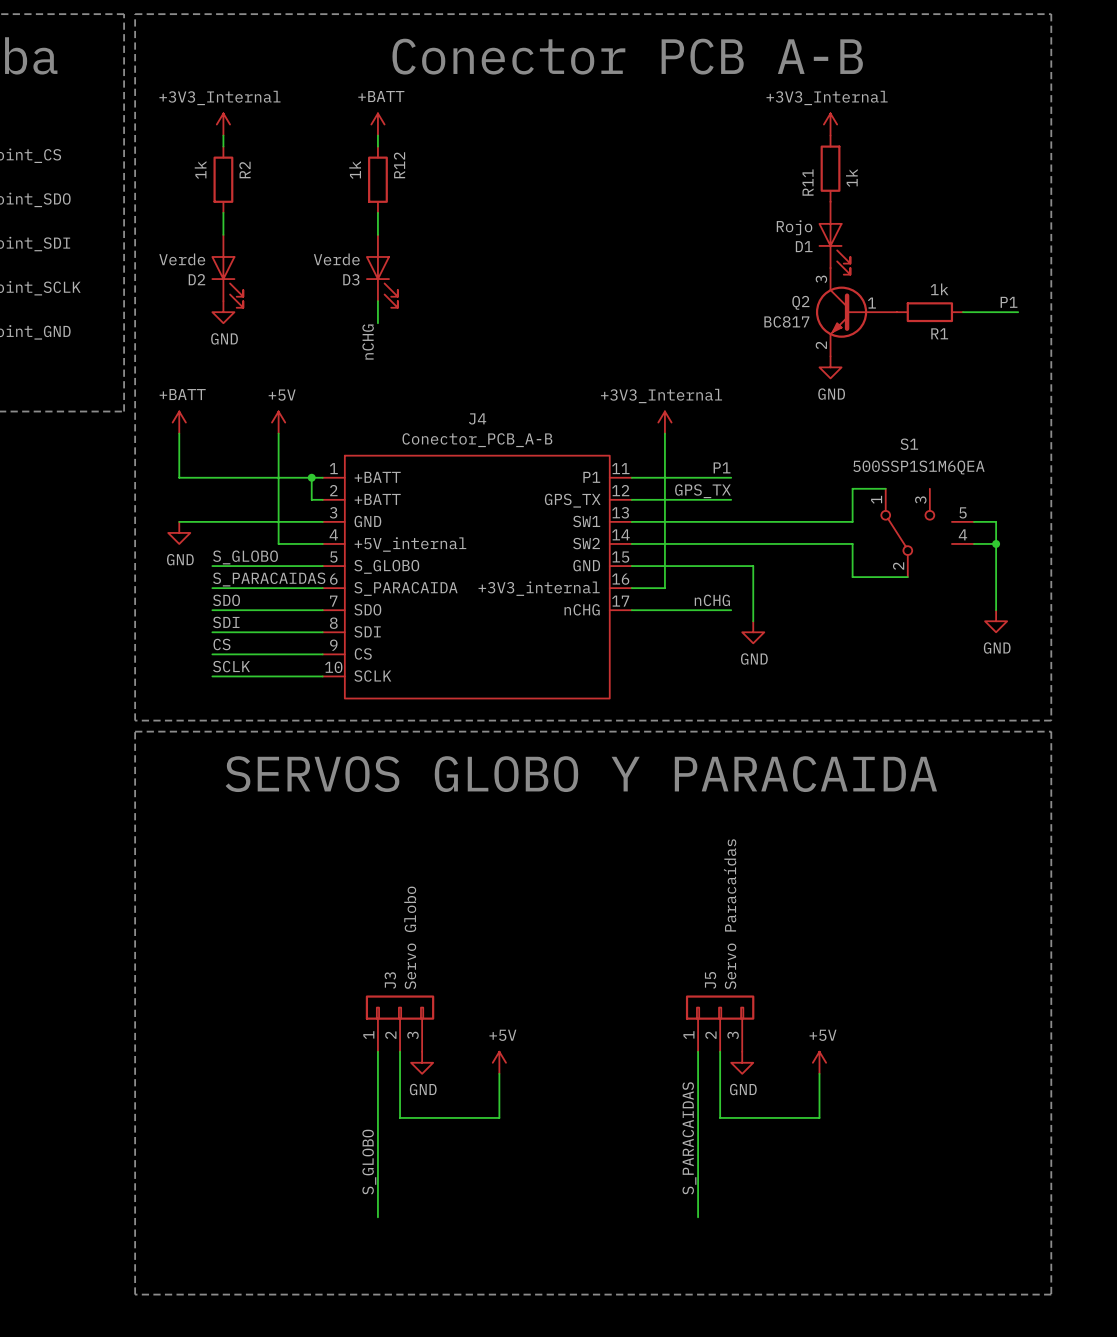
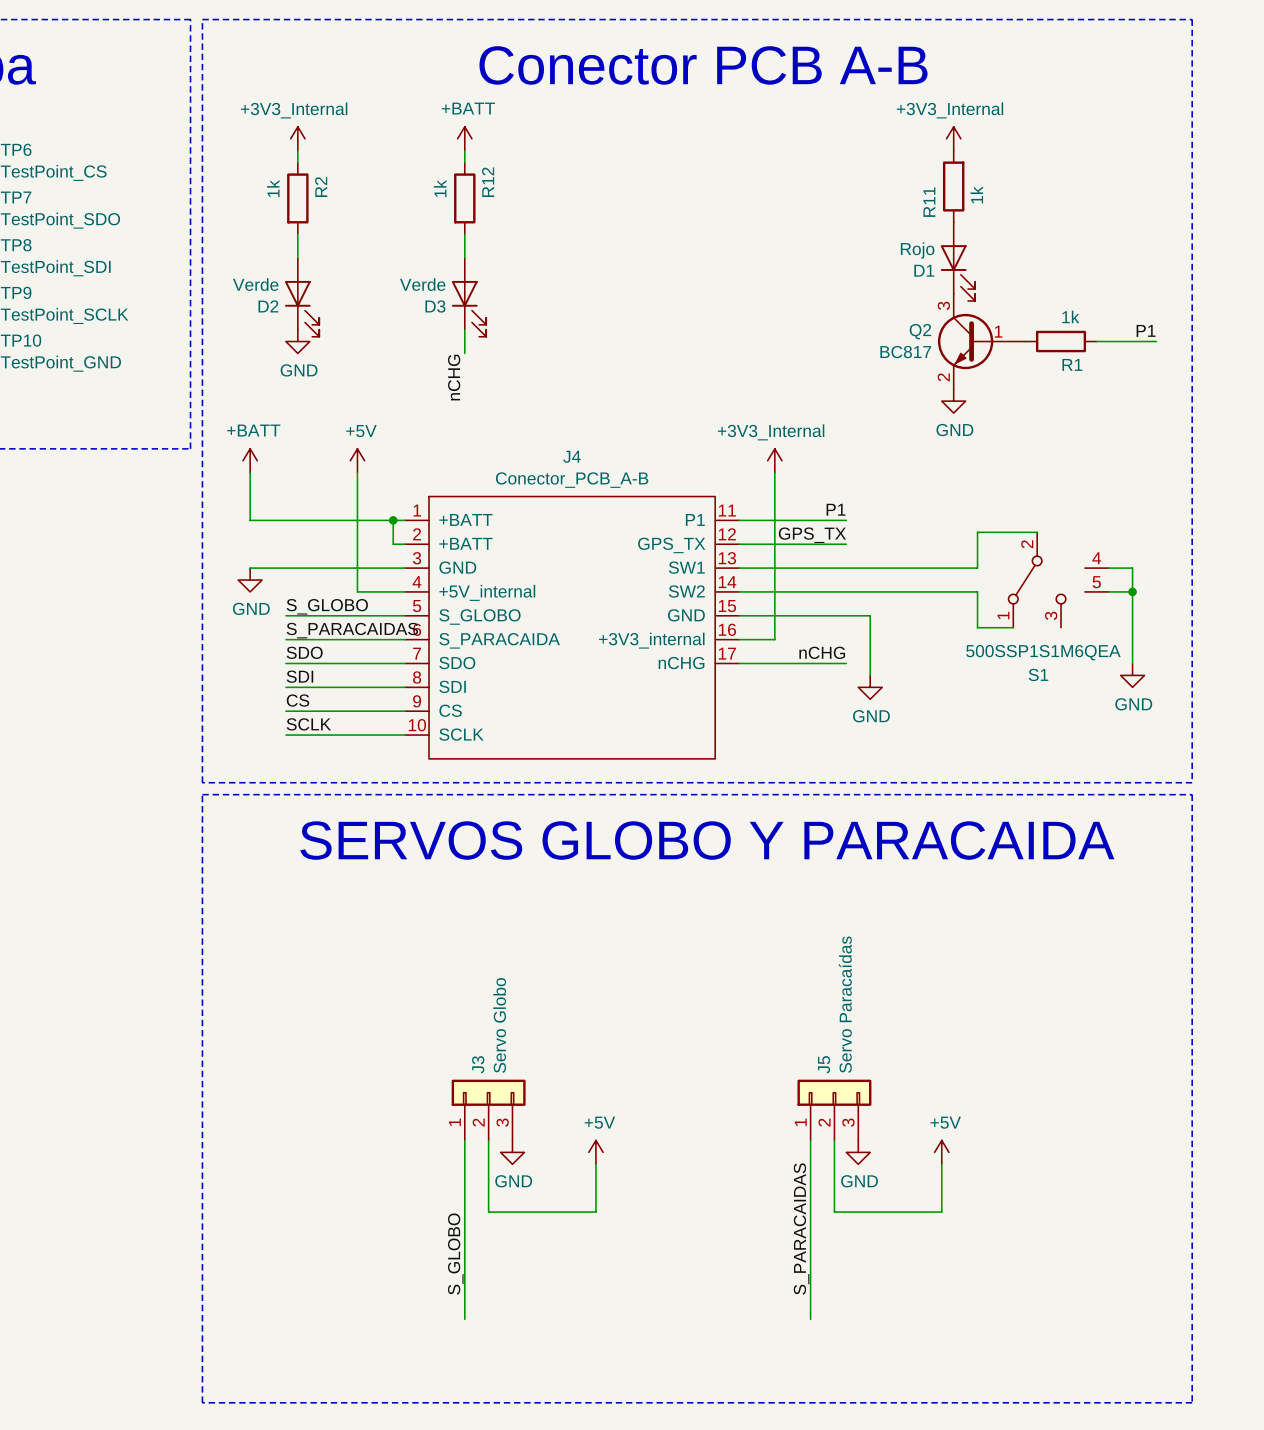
S1 flip: as is (907, 532) -> up-down (1037, 580)
wire: (885, 577) (907, 577) -> (1013, 532) (1037, 532)

